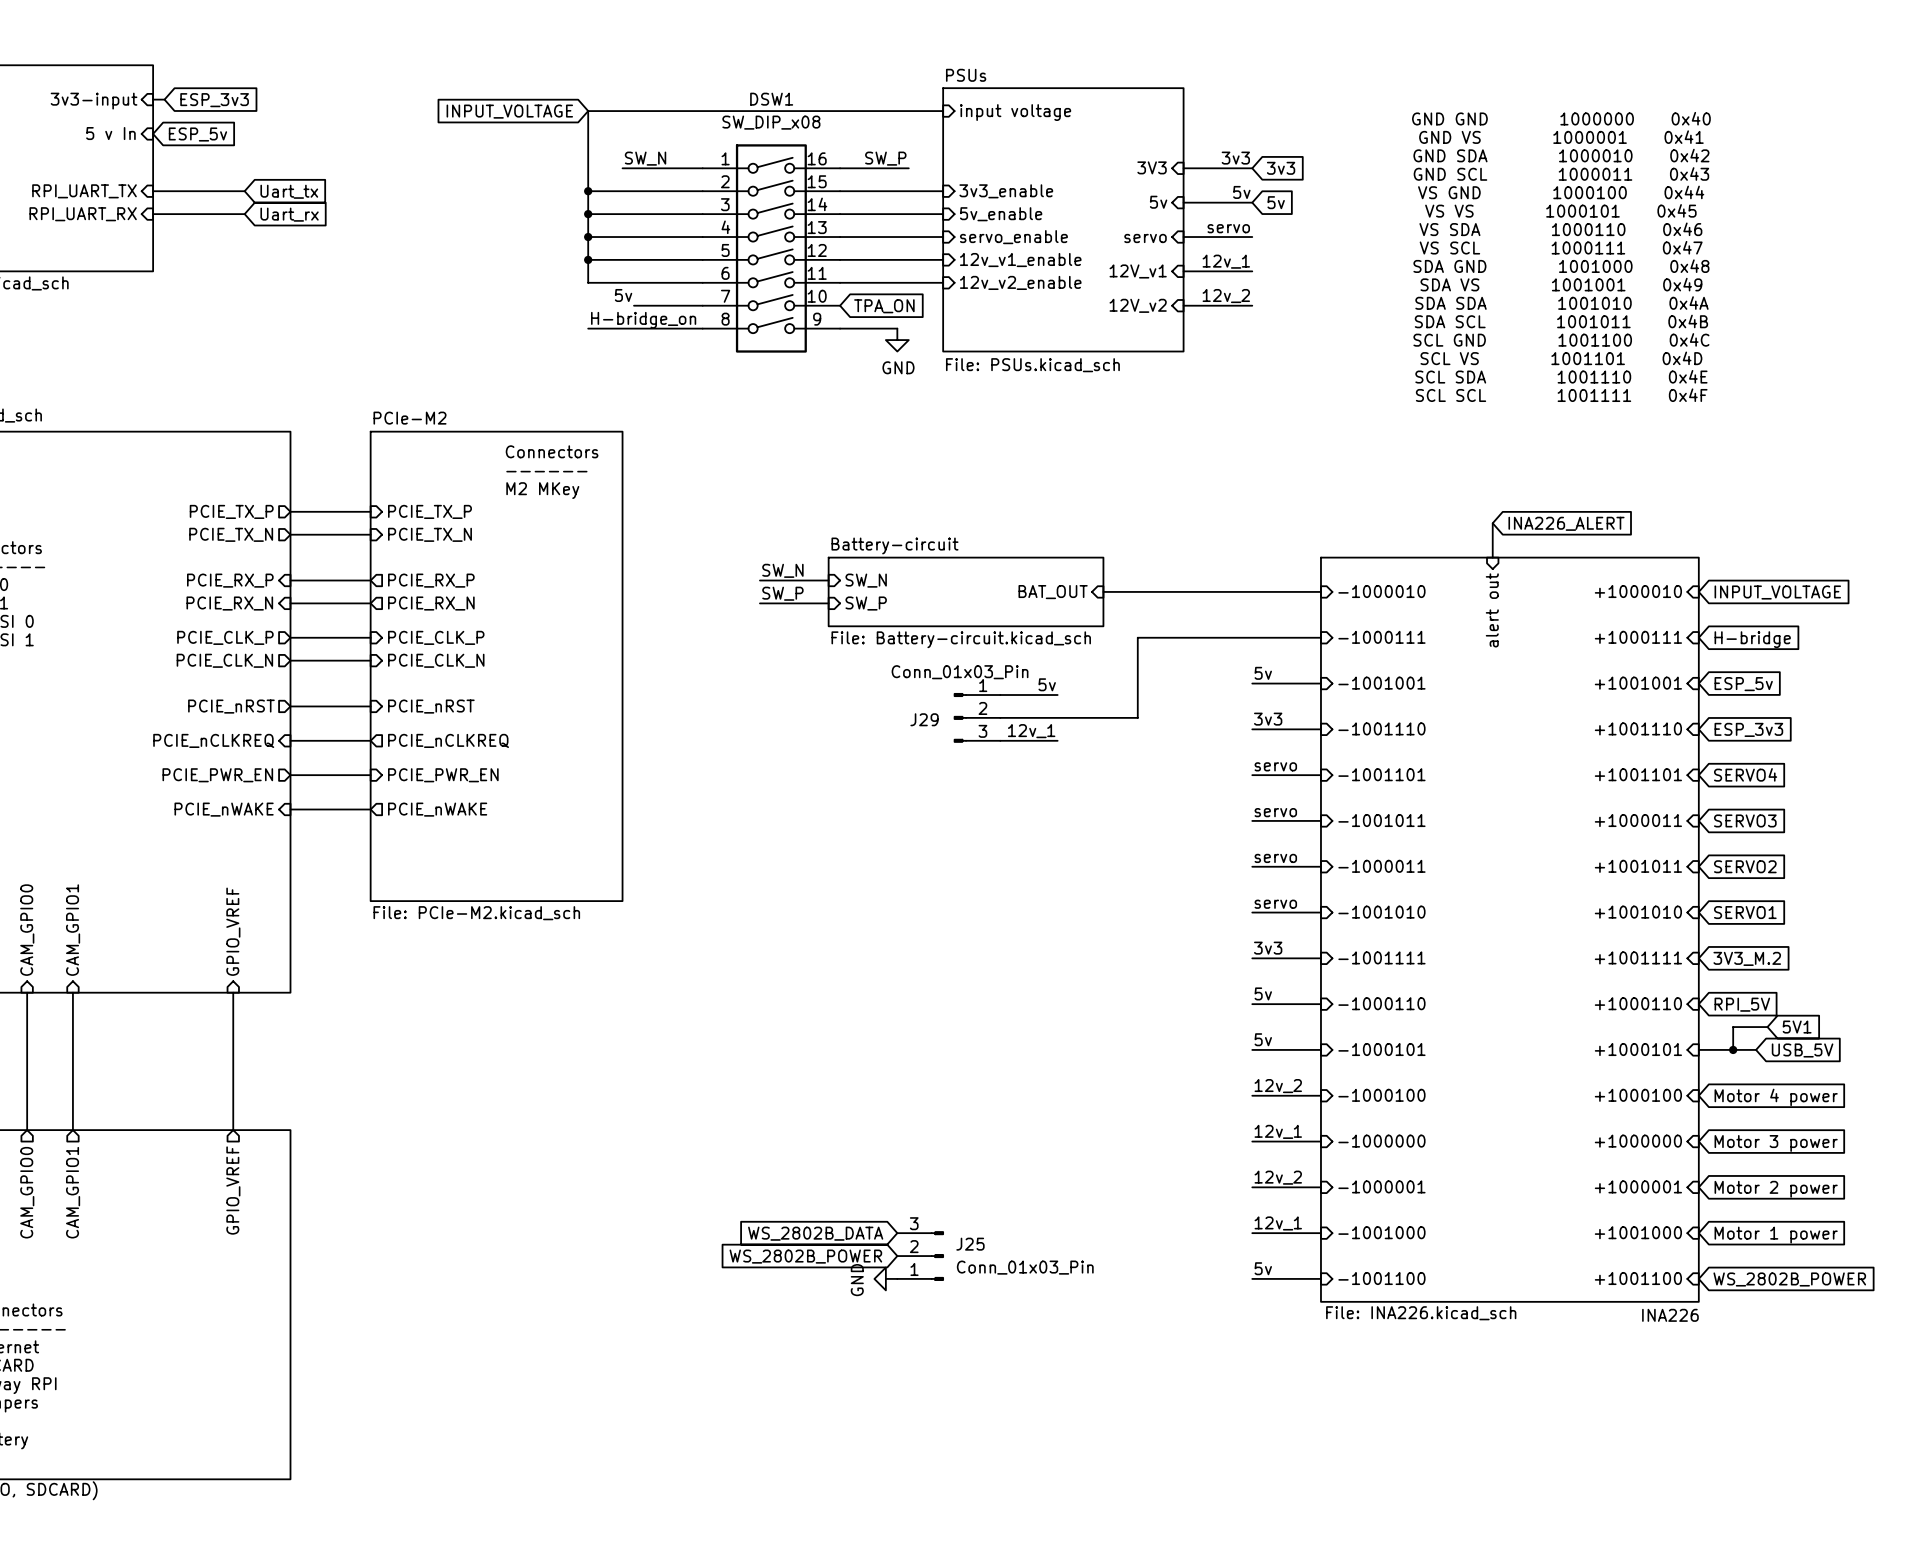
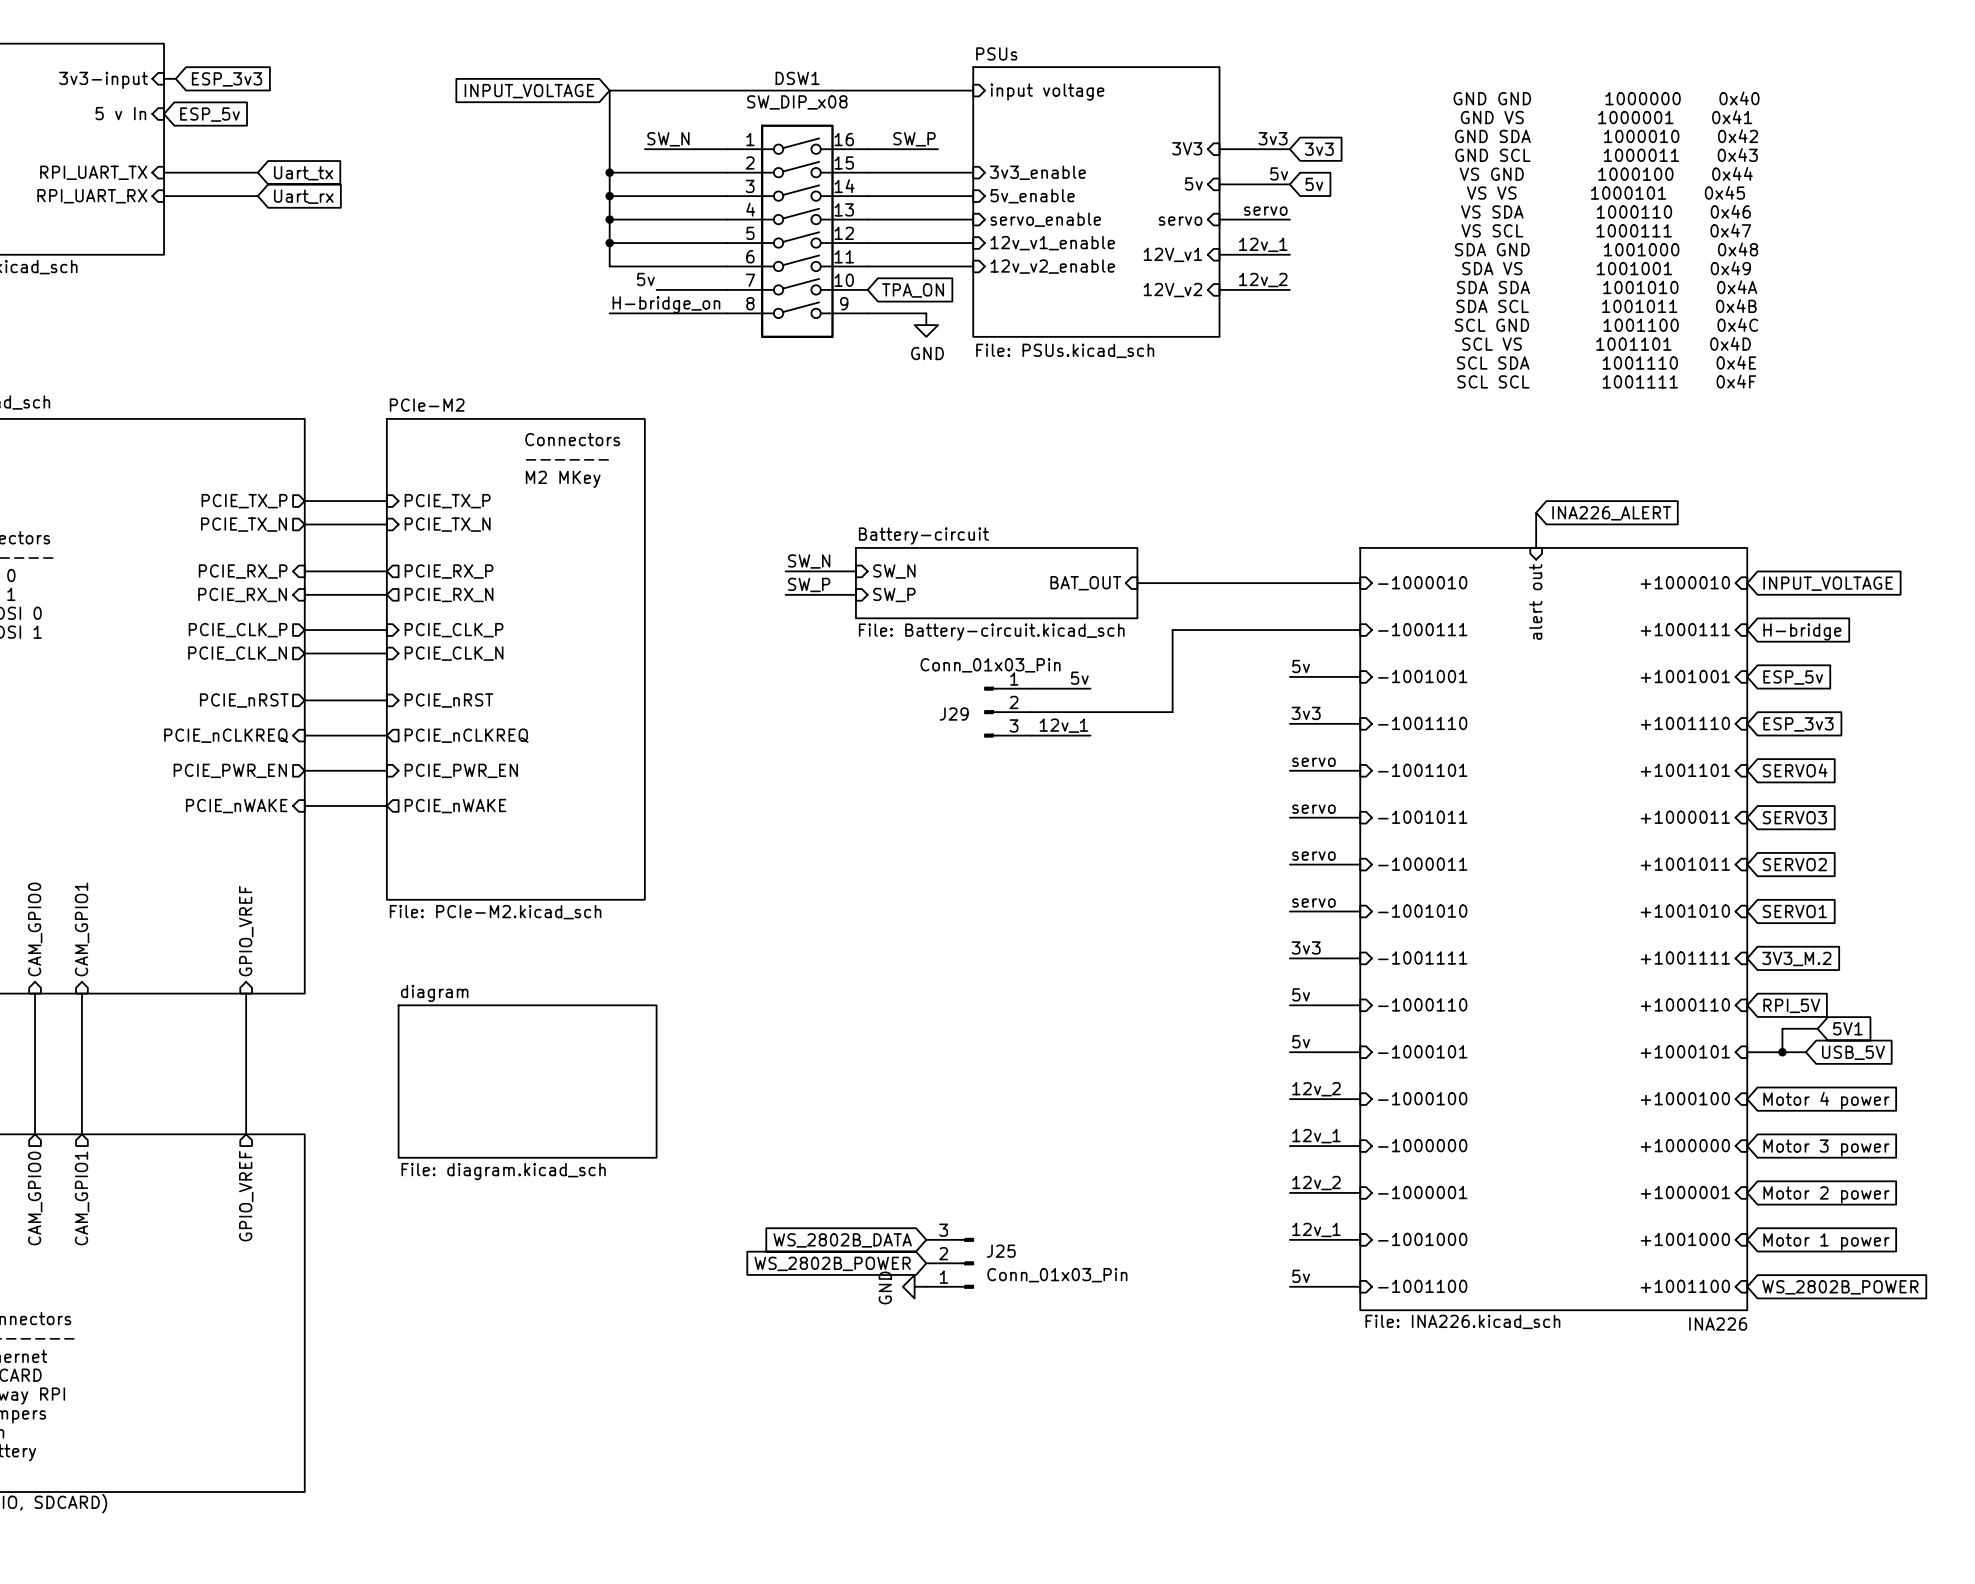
sheet diagram: none -> File: diagram.kicad_sch (527, 1081)

